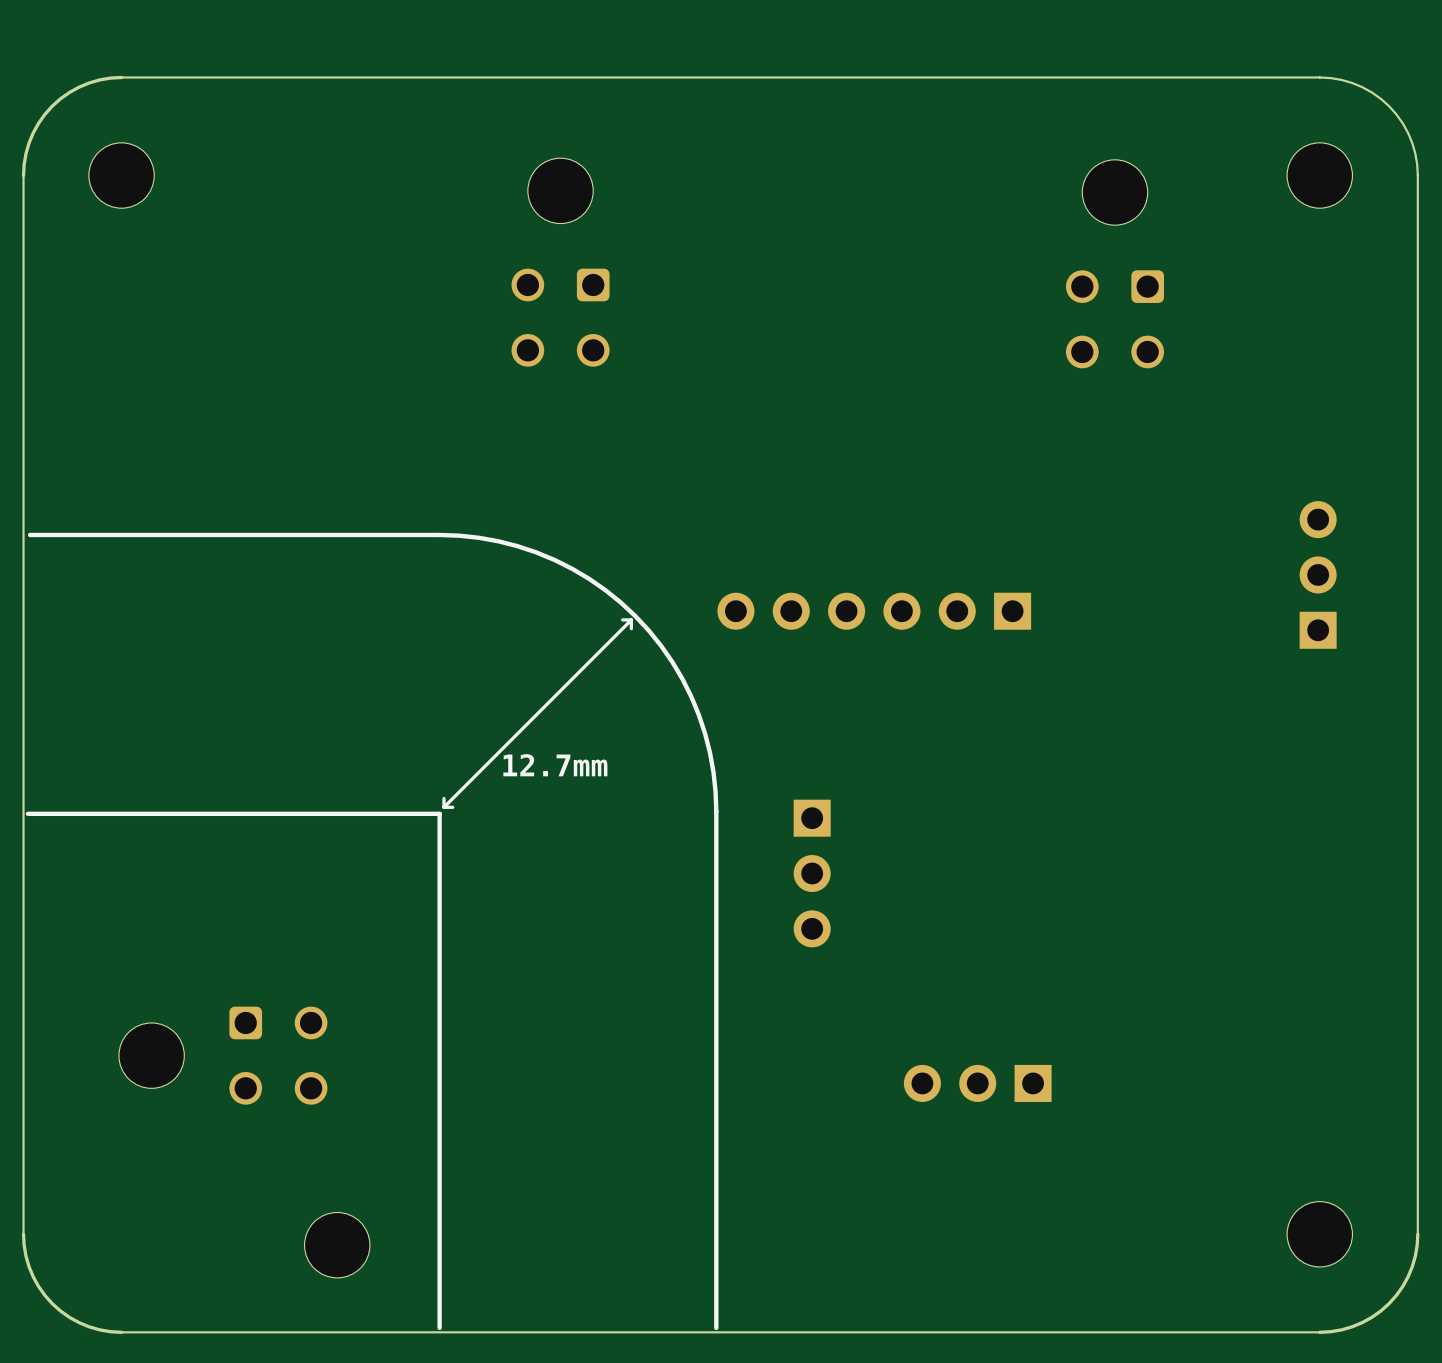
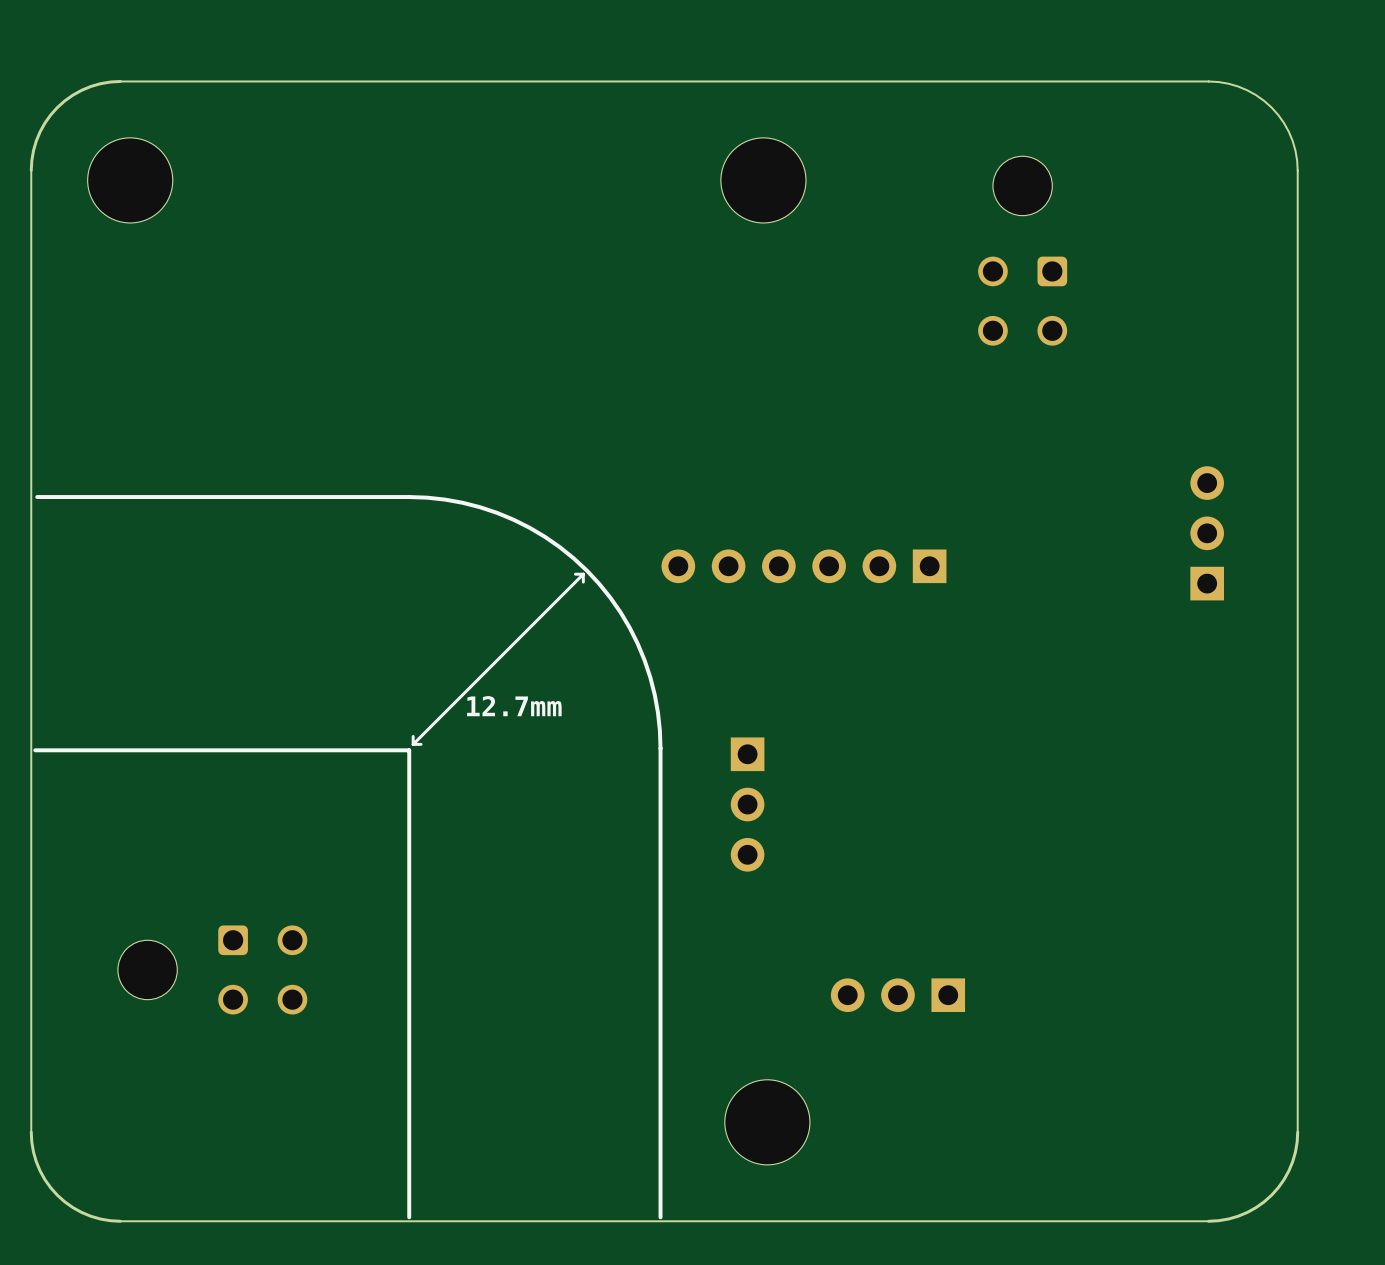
part footprint: [88, 142, 155, 209] -> [87, 137, 173, 223]
part: (1319, 175) -> none
part: none -> (763, 180)
part: (560, 262) -> none
part: none -> (767, 1122)
part: (1319, 1234) -> none
part: (337, 1245) -> none

